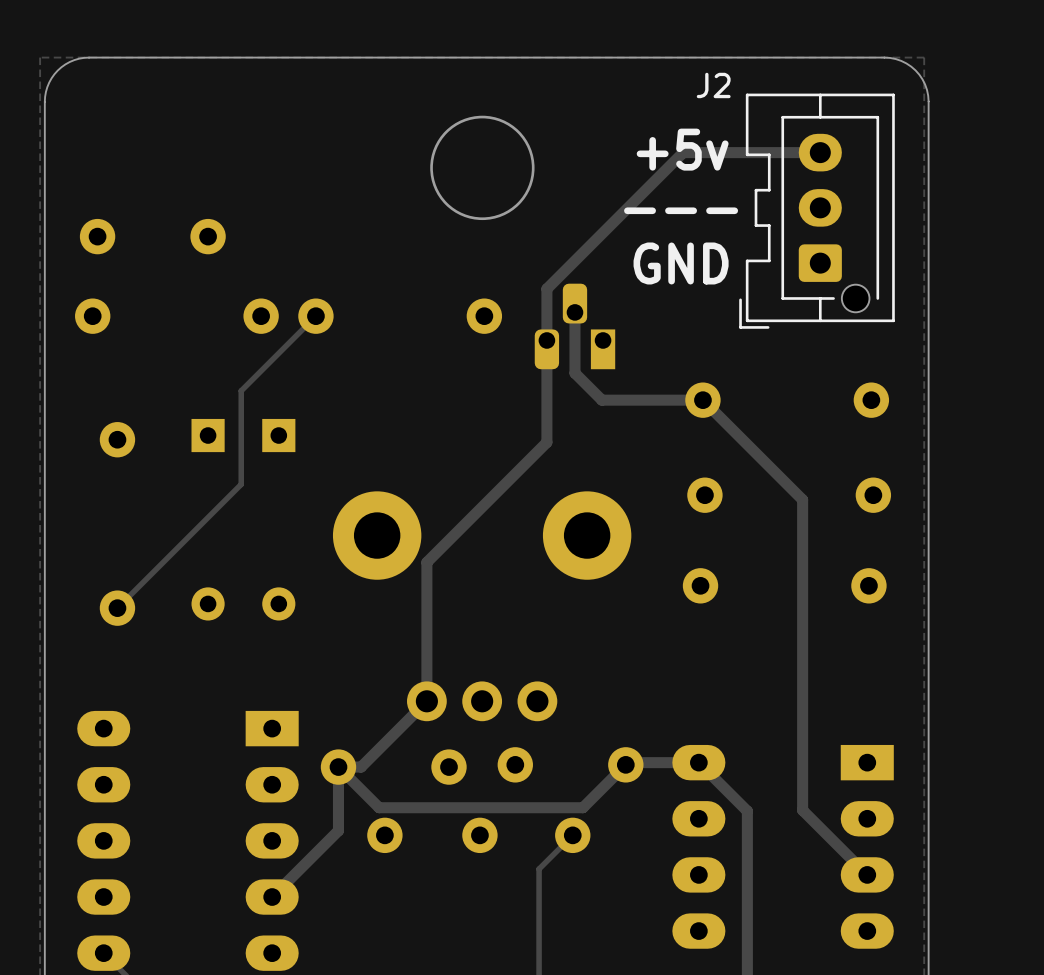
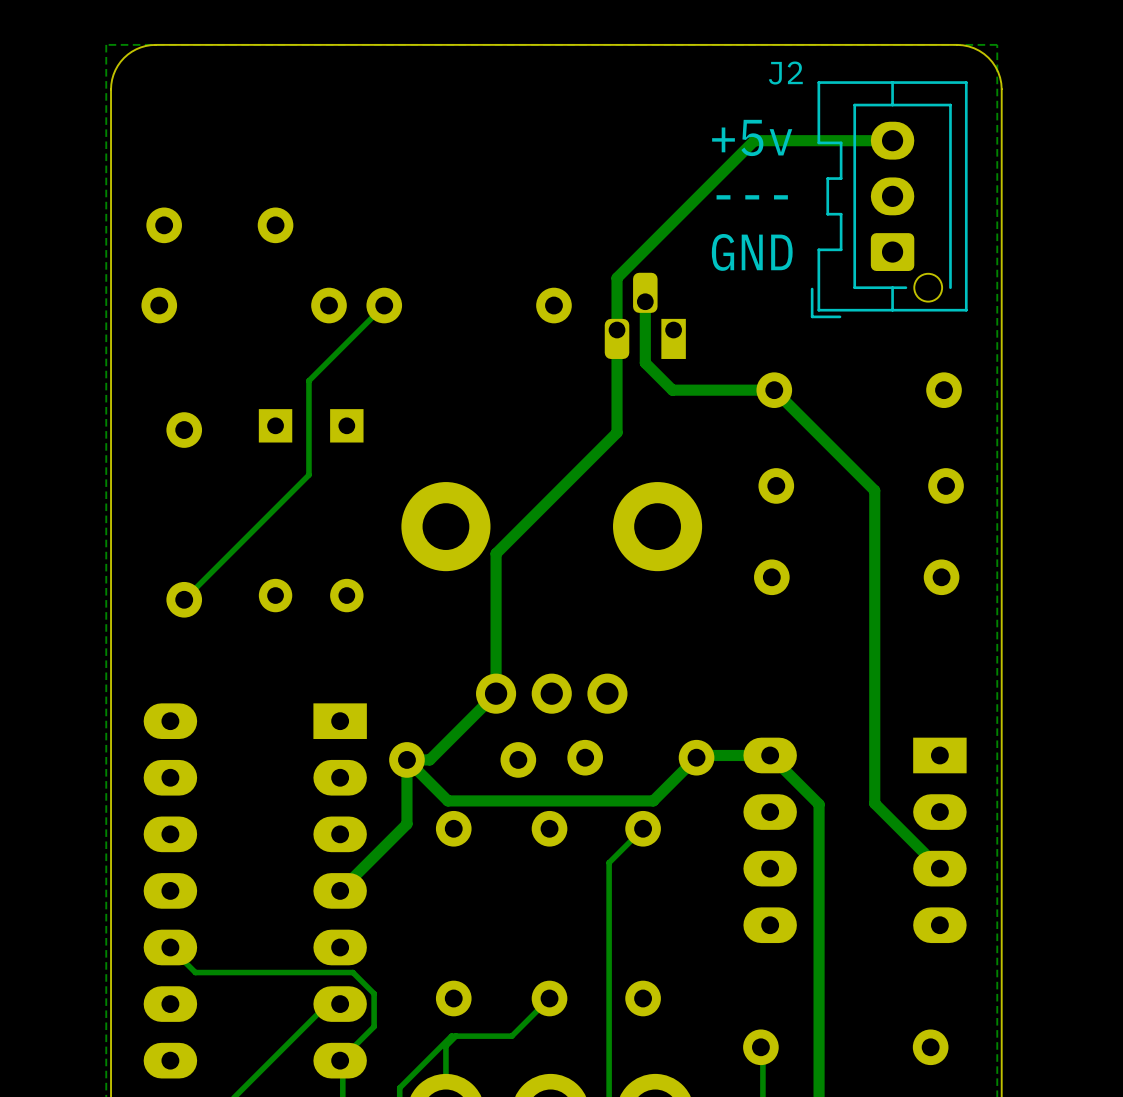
round board edge: [430, 115, 535, 221] -> none

